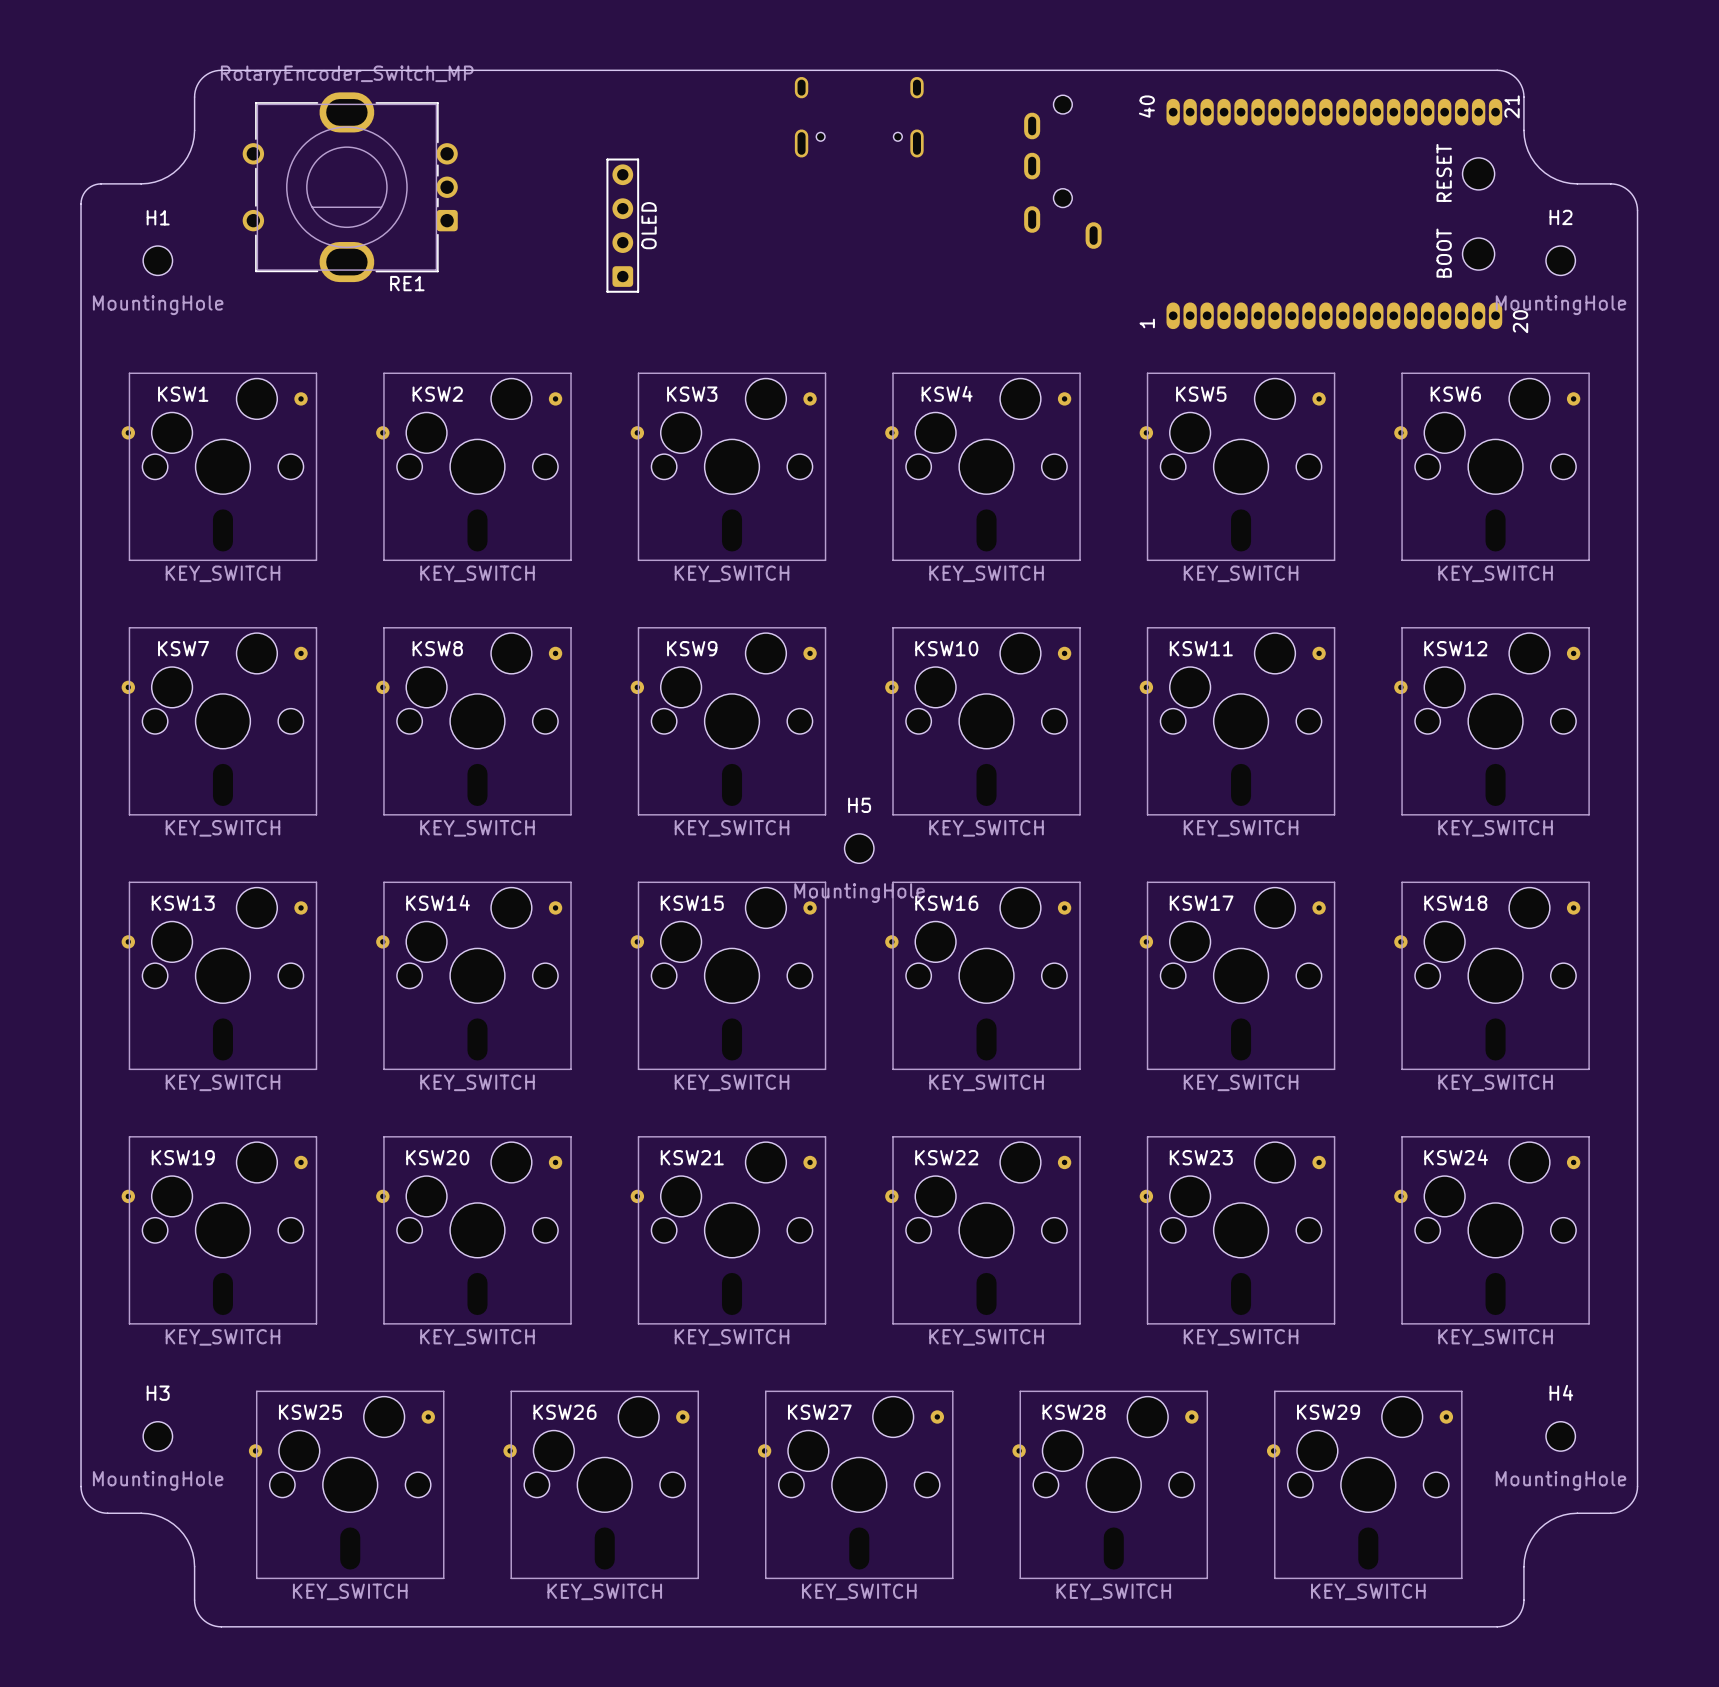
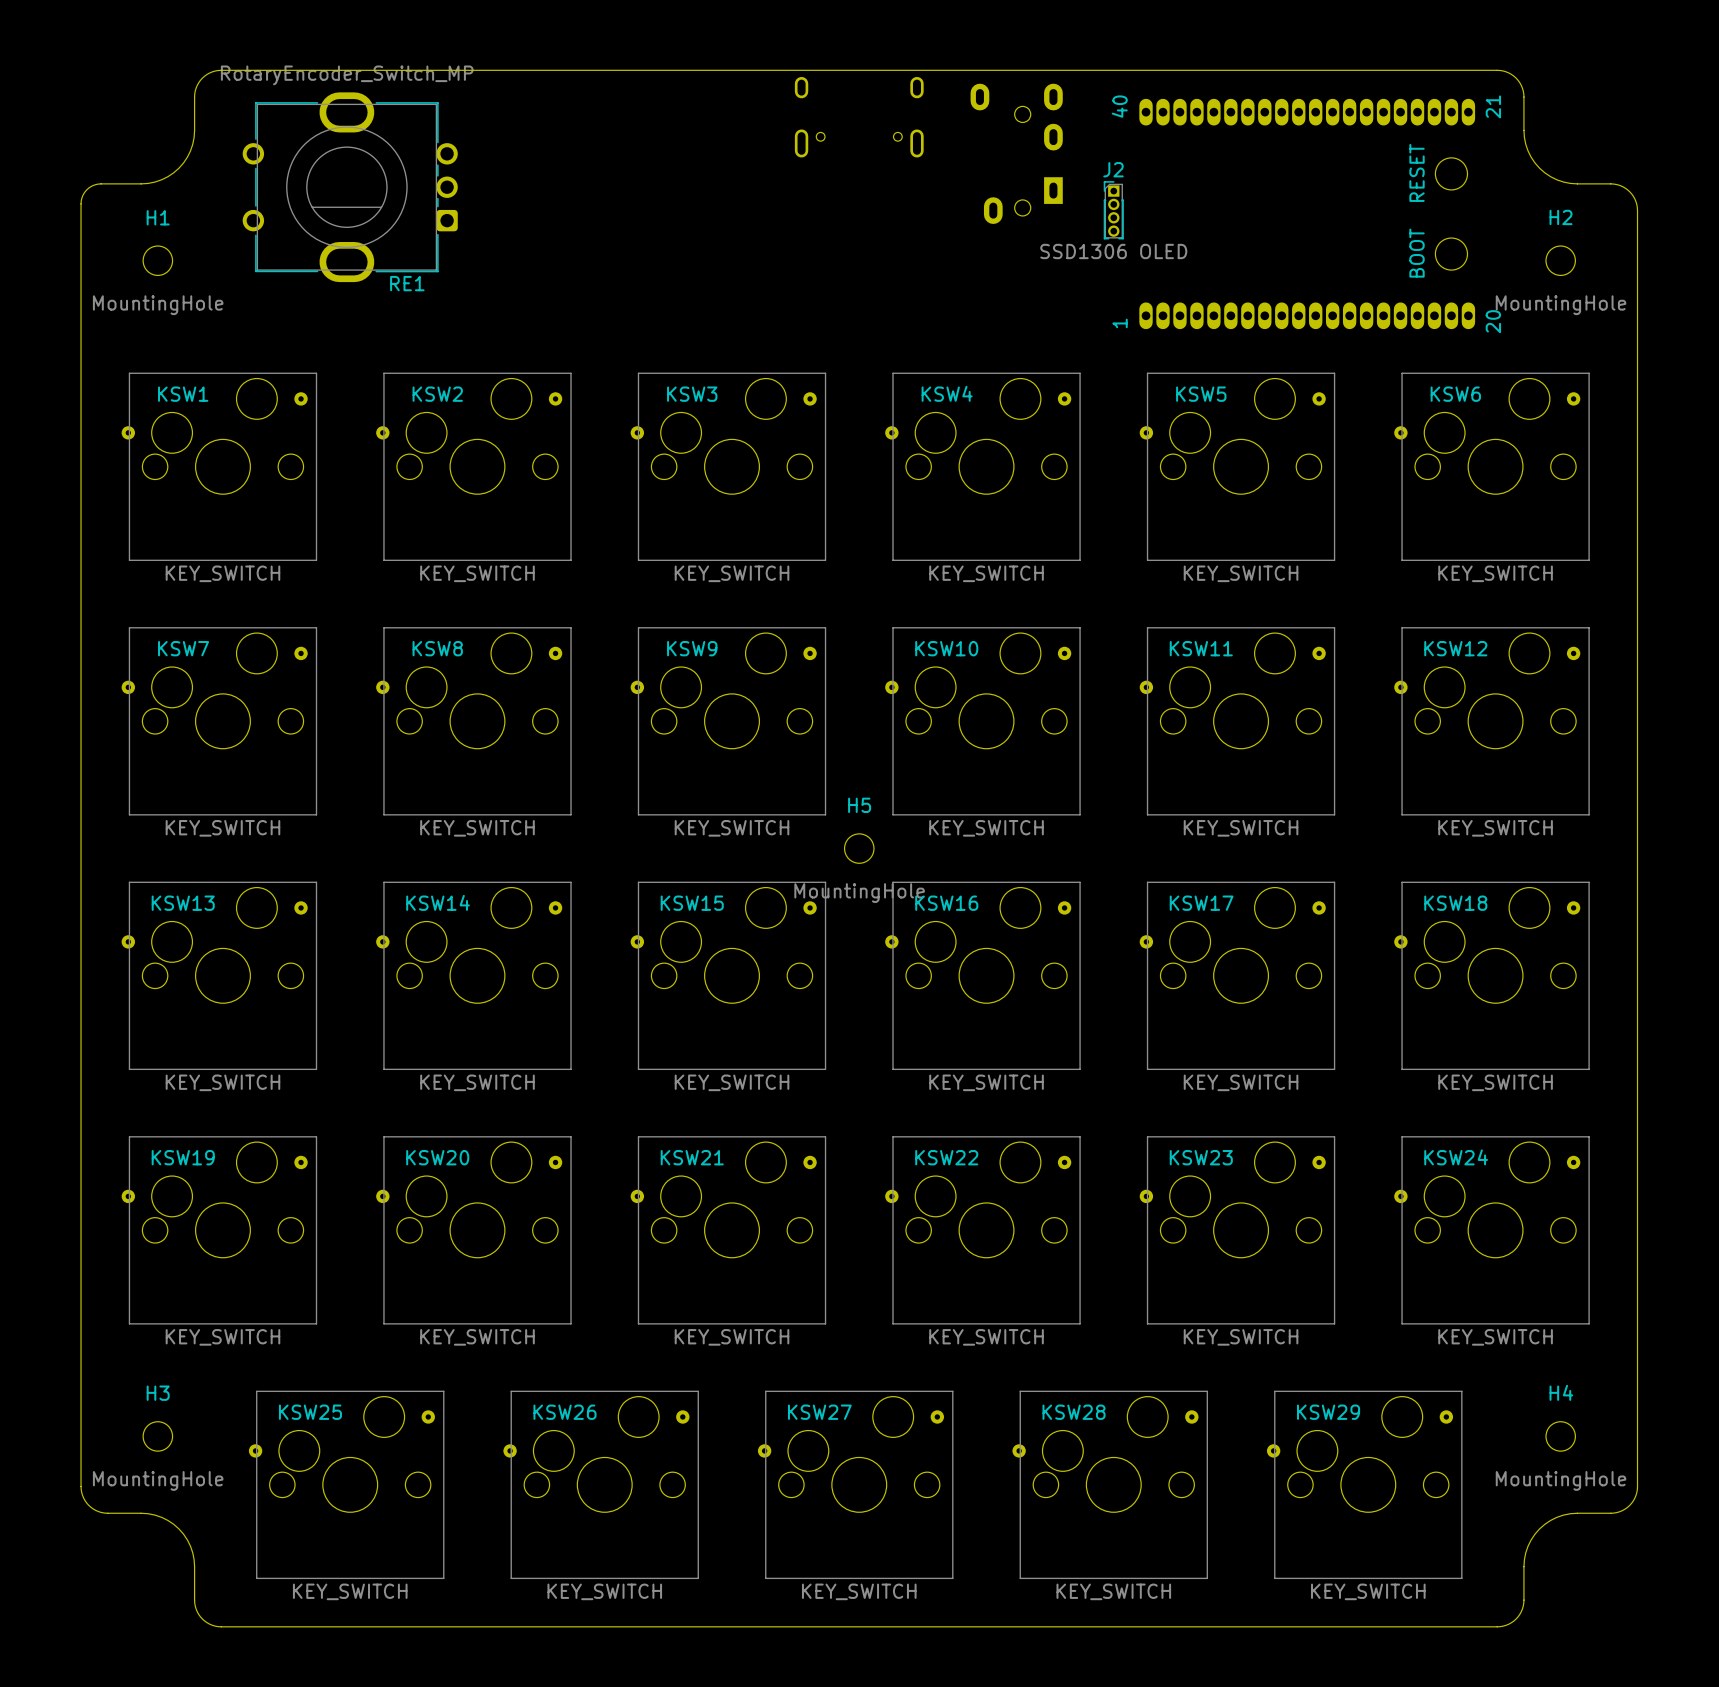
part: none -> (1016, 153)
part: (1062, 172) -> none
J2: none -> SSD1306 OLED (1113, 210)
part: none -> (1307, 213)
part: (1334, 213) -> none
part: (622, 225) -> none

